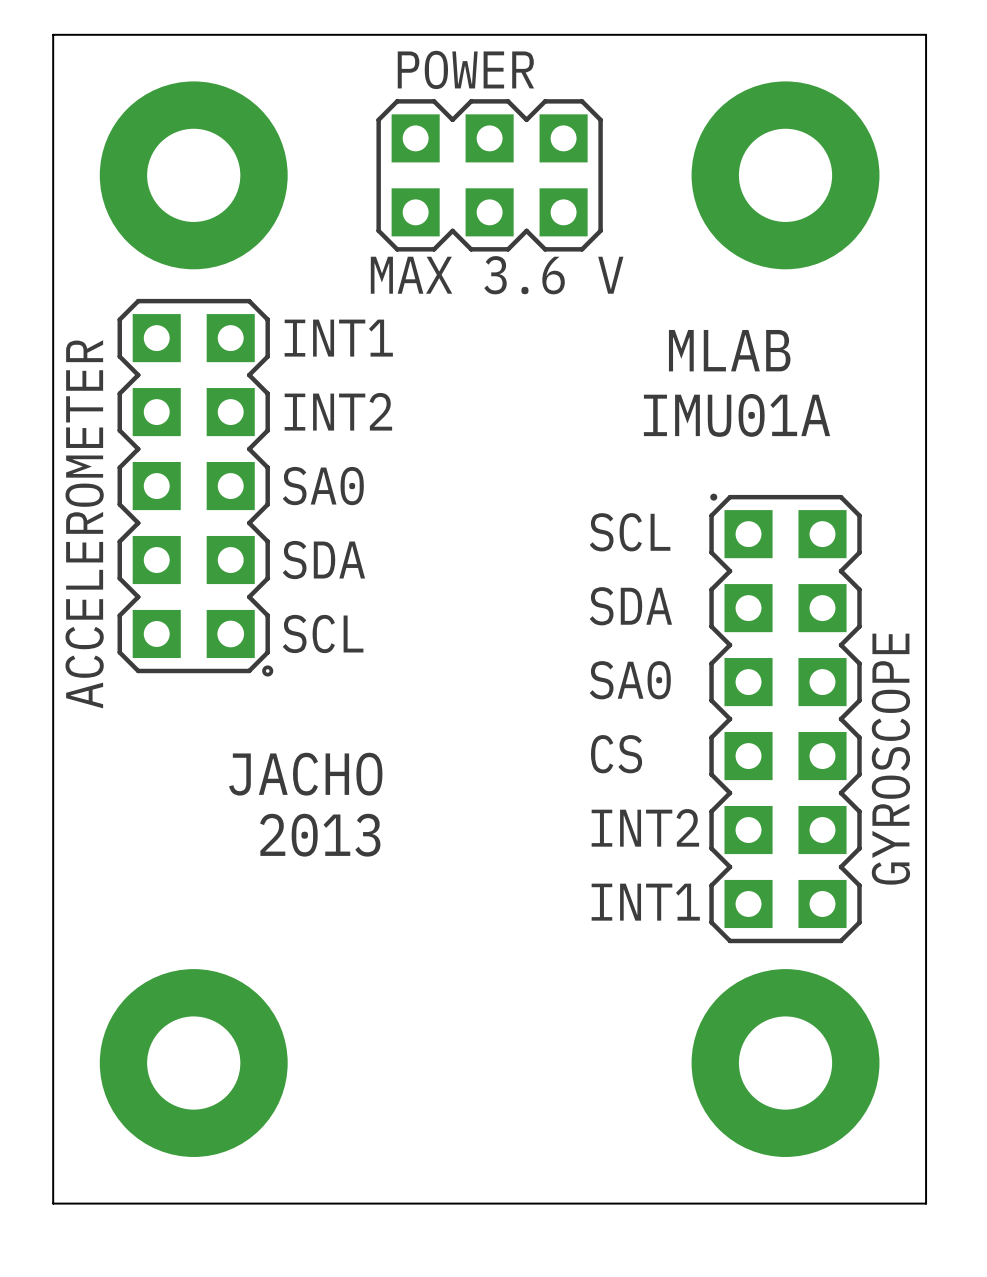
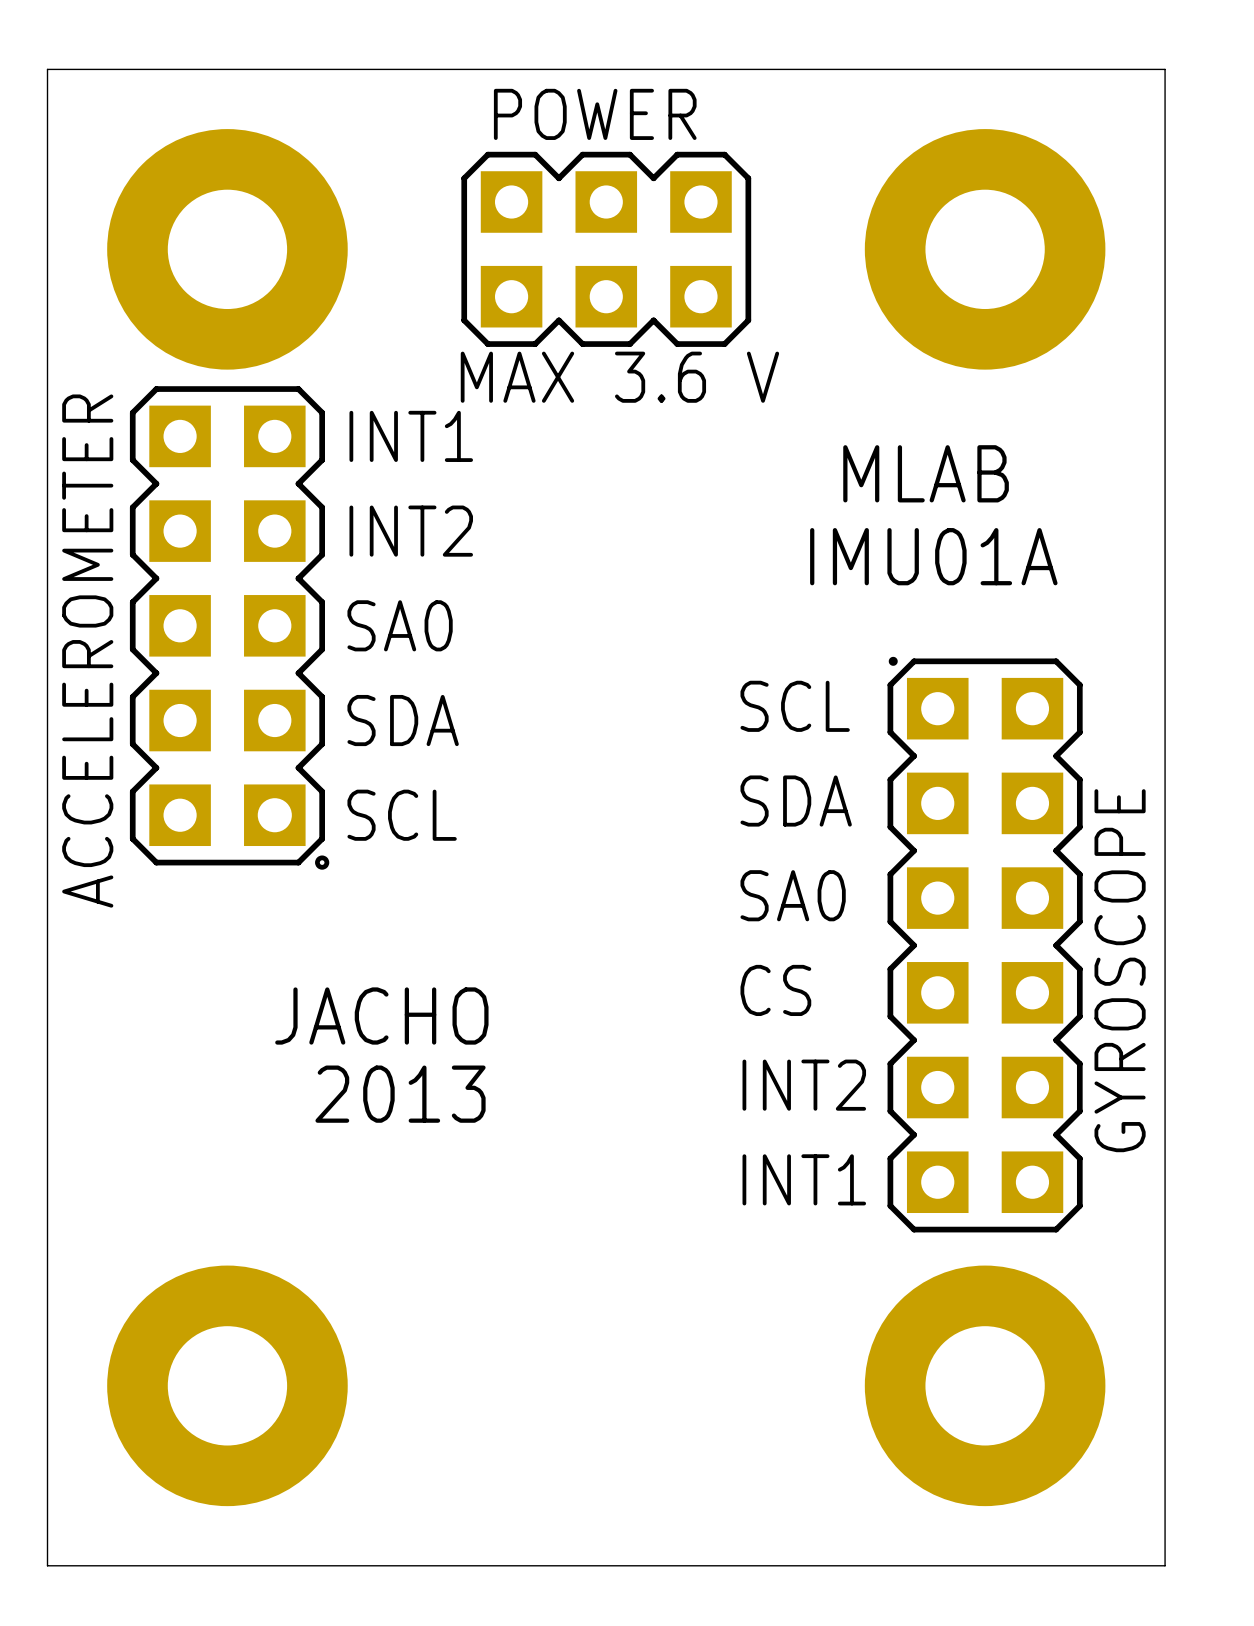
text position: INT1 (338, 338) -> INT1 (411, 436)
text position: INT2 (338, 411) -> INT2 (411, 531)
text position: SA0 (323, 486) -> SA0 (400, 625)
part position: (195, 487) -> (229, 627)
text position: ACCELEROMETER (84, 524) -> ACCELEROMETER (87, 651)
text position: SDA (323, 560) -> SDA (403, 720)
text position: SCL (323, 633) -> SCL (402, 815)

